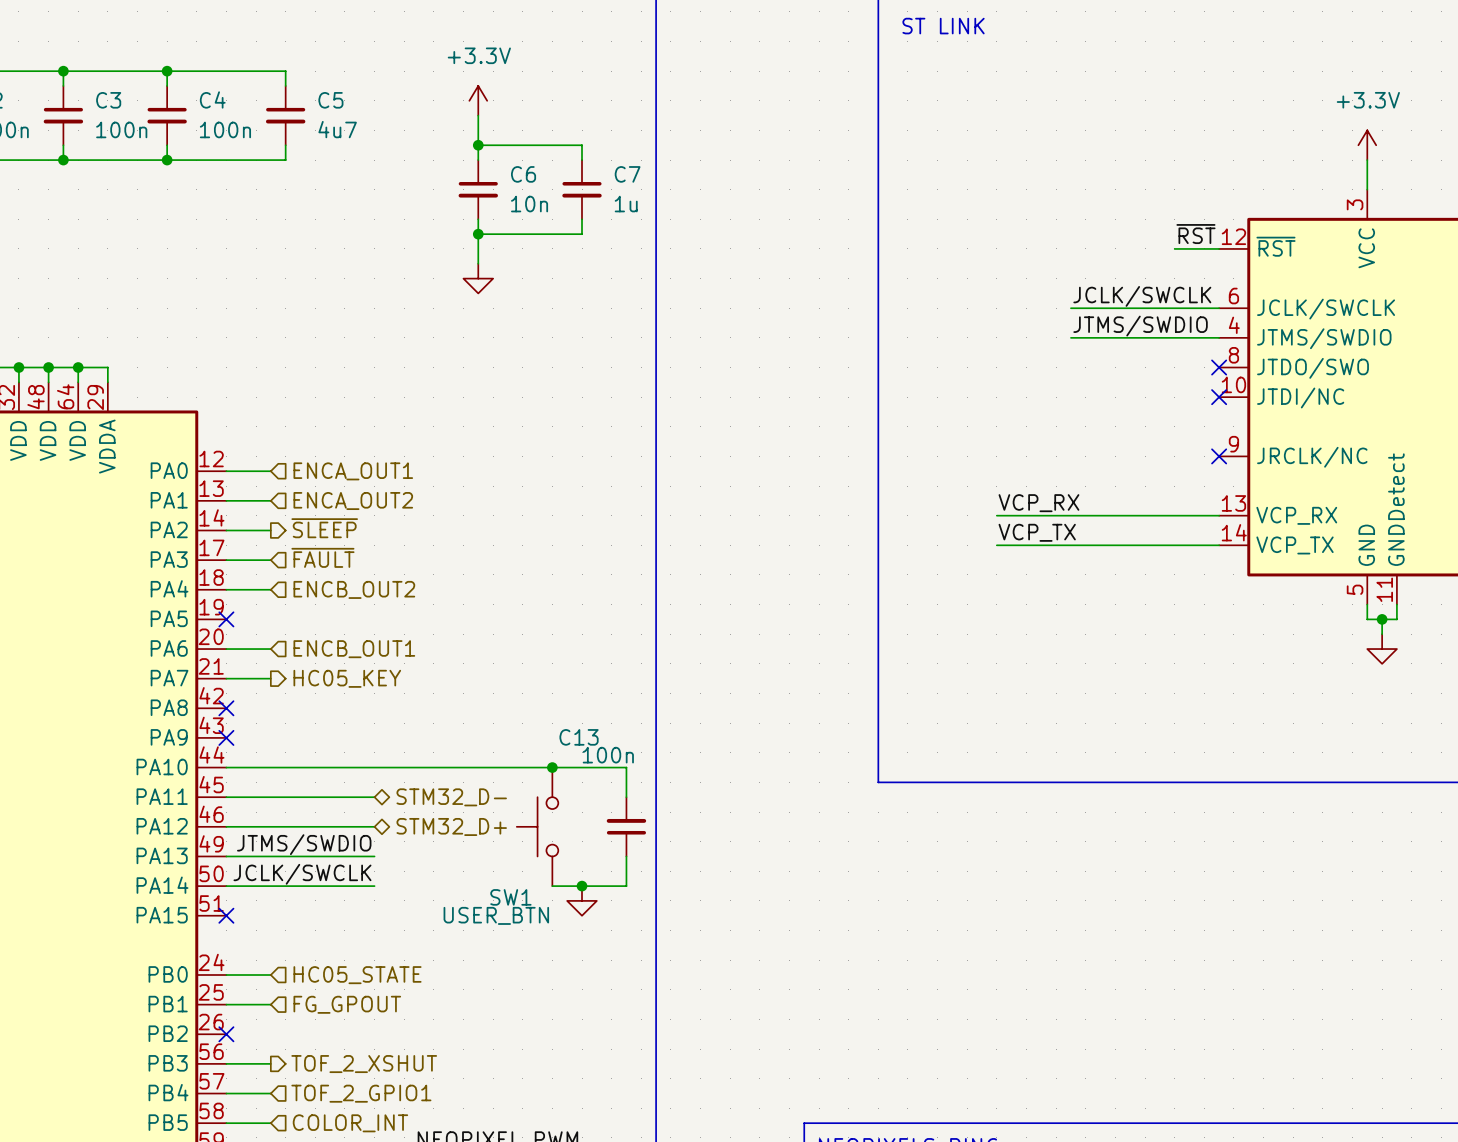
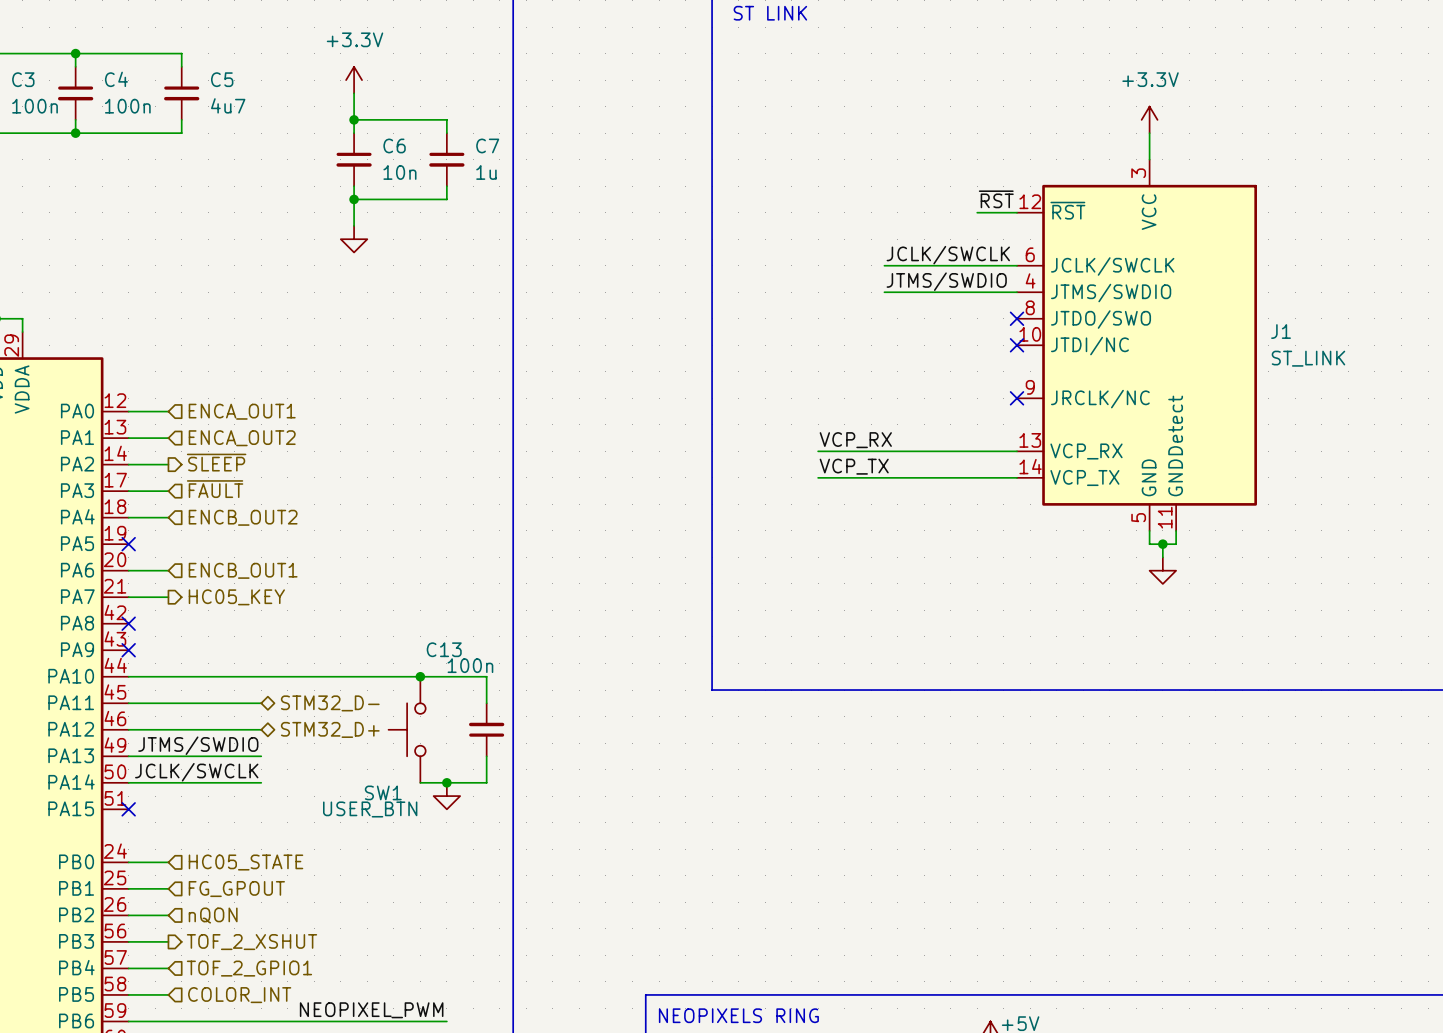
wire: none -> (128, 915) (168, 915)
no-connect mark: (226, 1034) -> none
hierarchical label: none -> nQON (213, 915)

